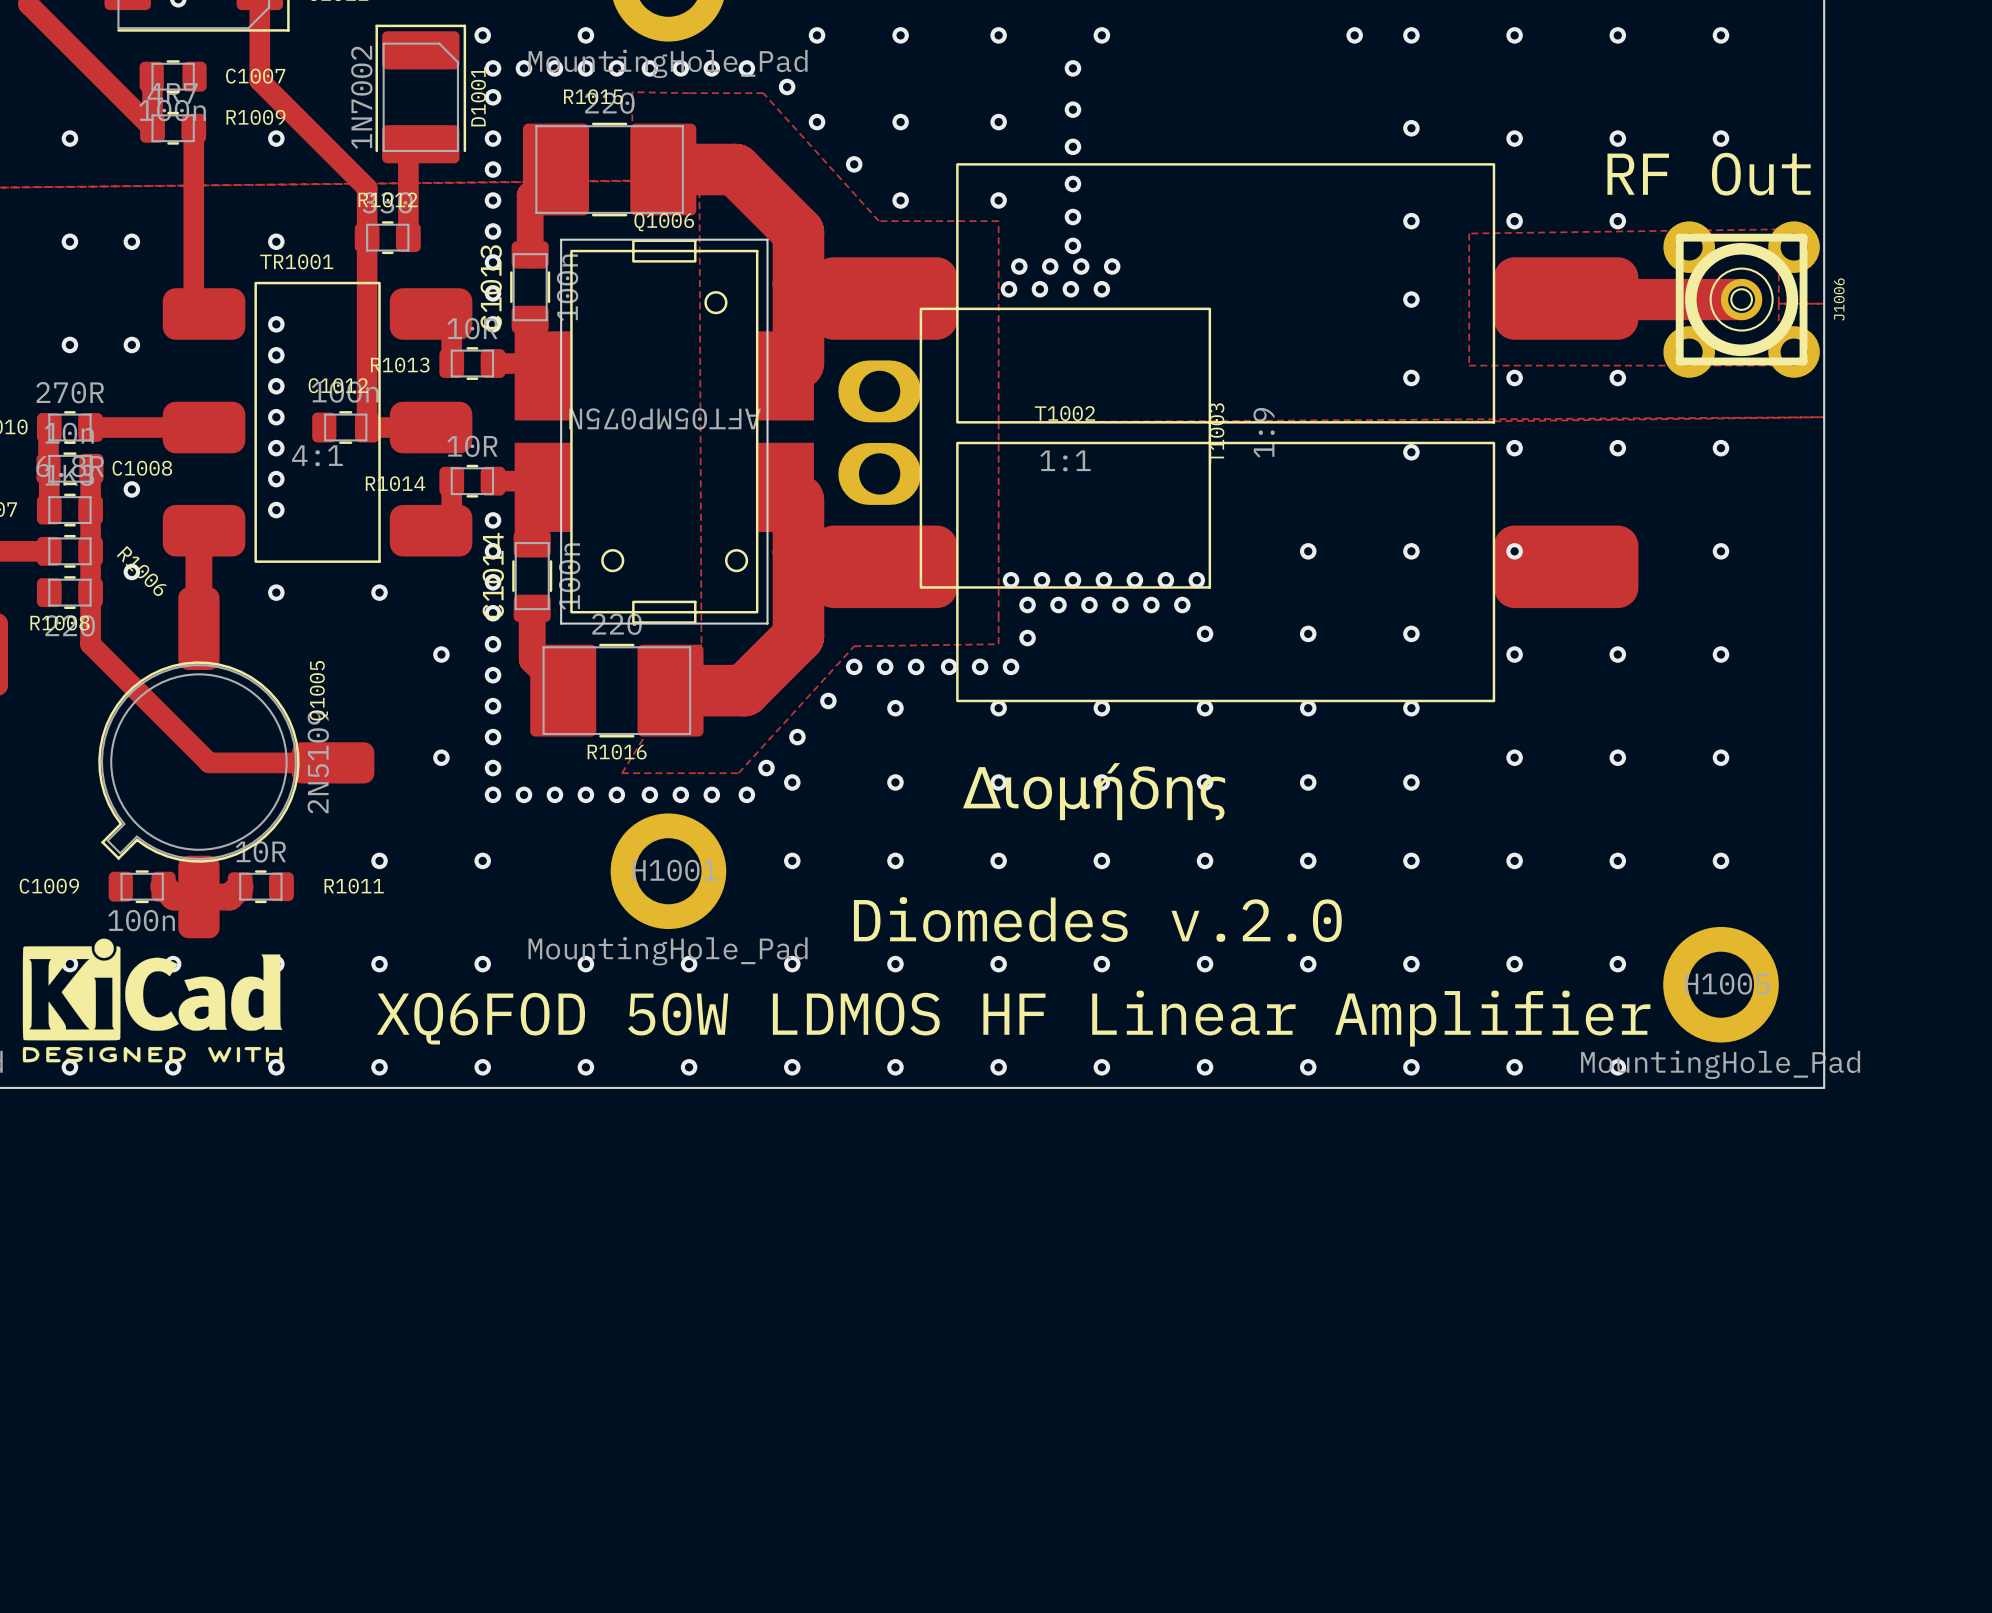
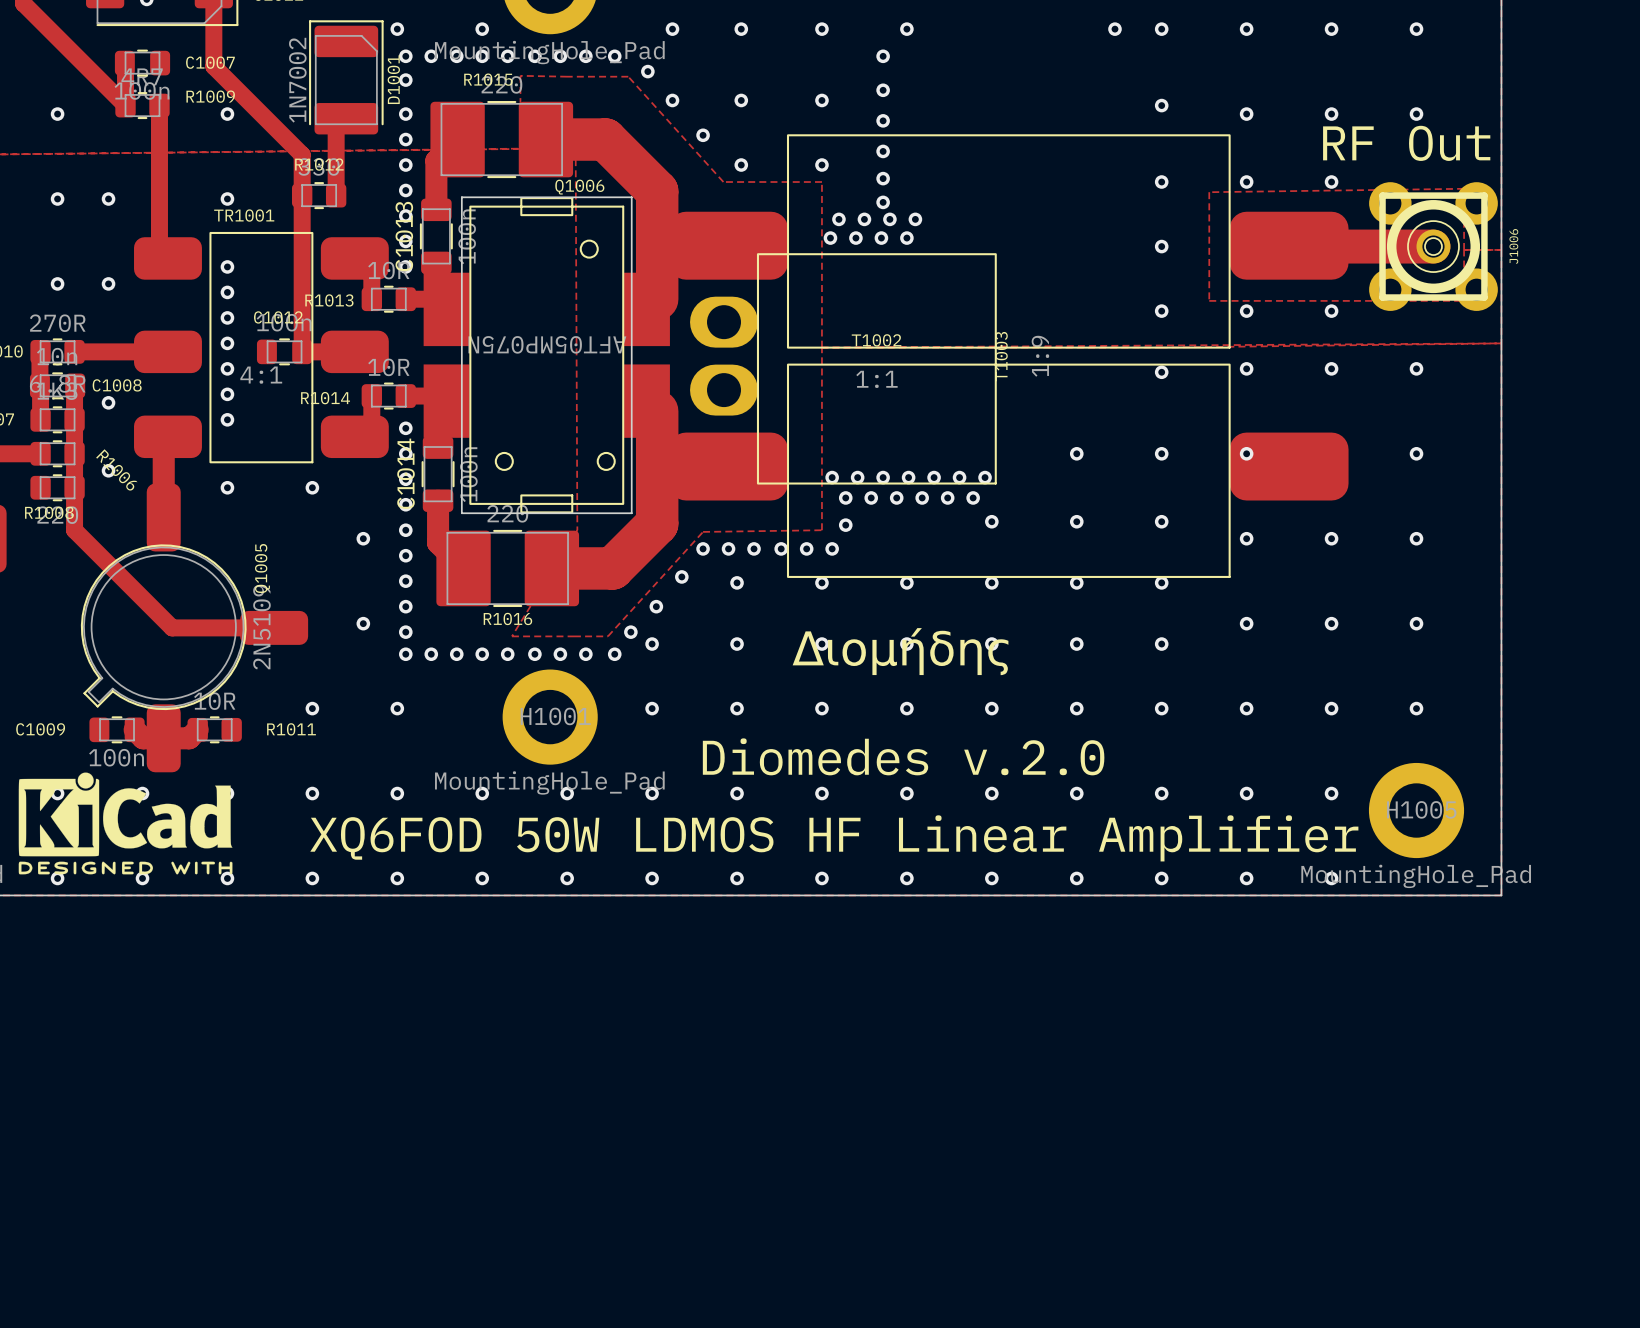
Q1006 name position: Q1006 (664, 222) -> Q1006 (579, 187)

